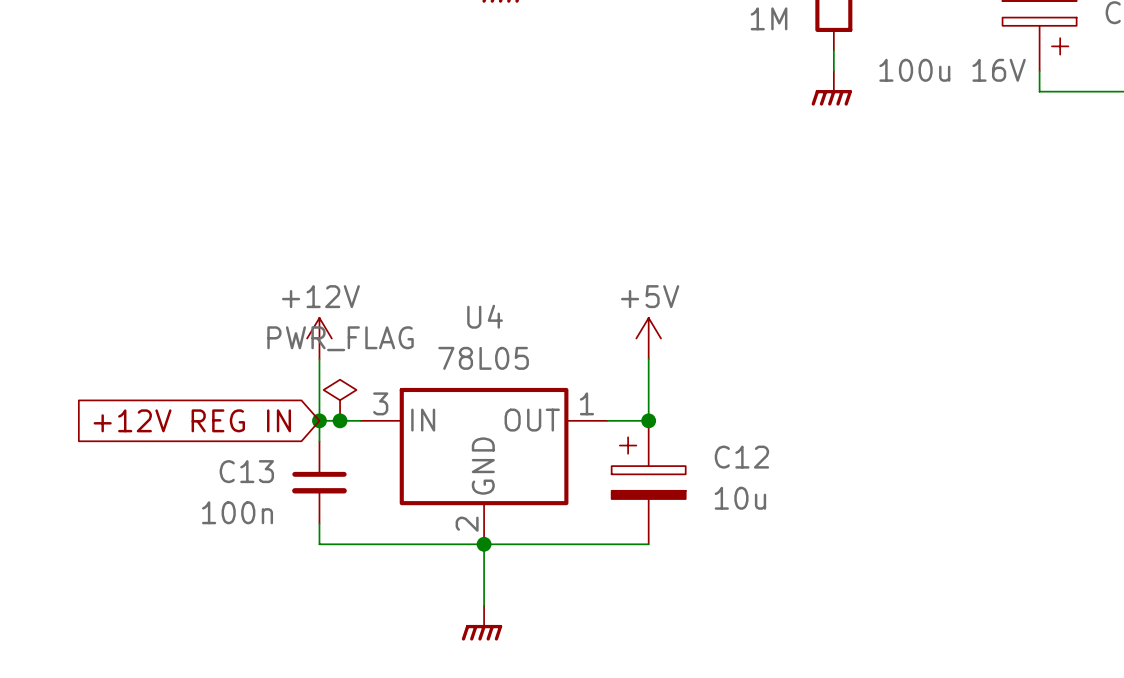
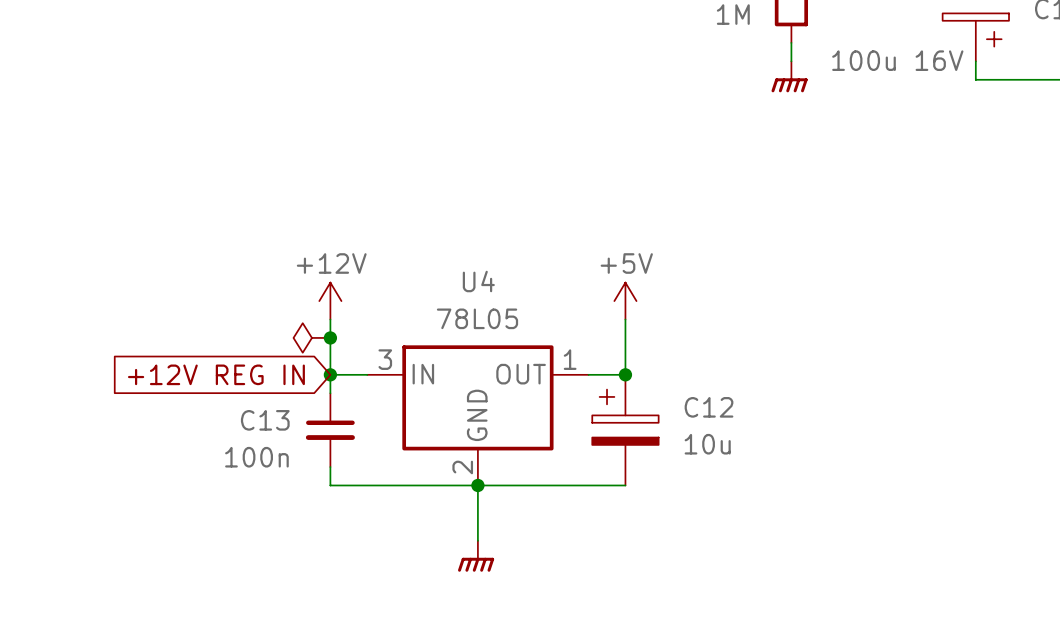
power symbol: none -> (311, 337)
power symbol: PWR_FLAG (340, 400) -> none
junction position: (340, 420) -> (330, 337)

